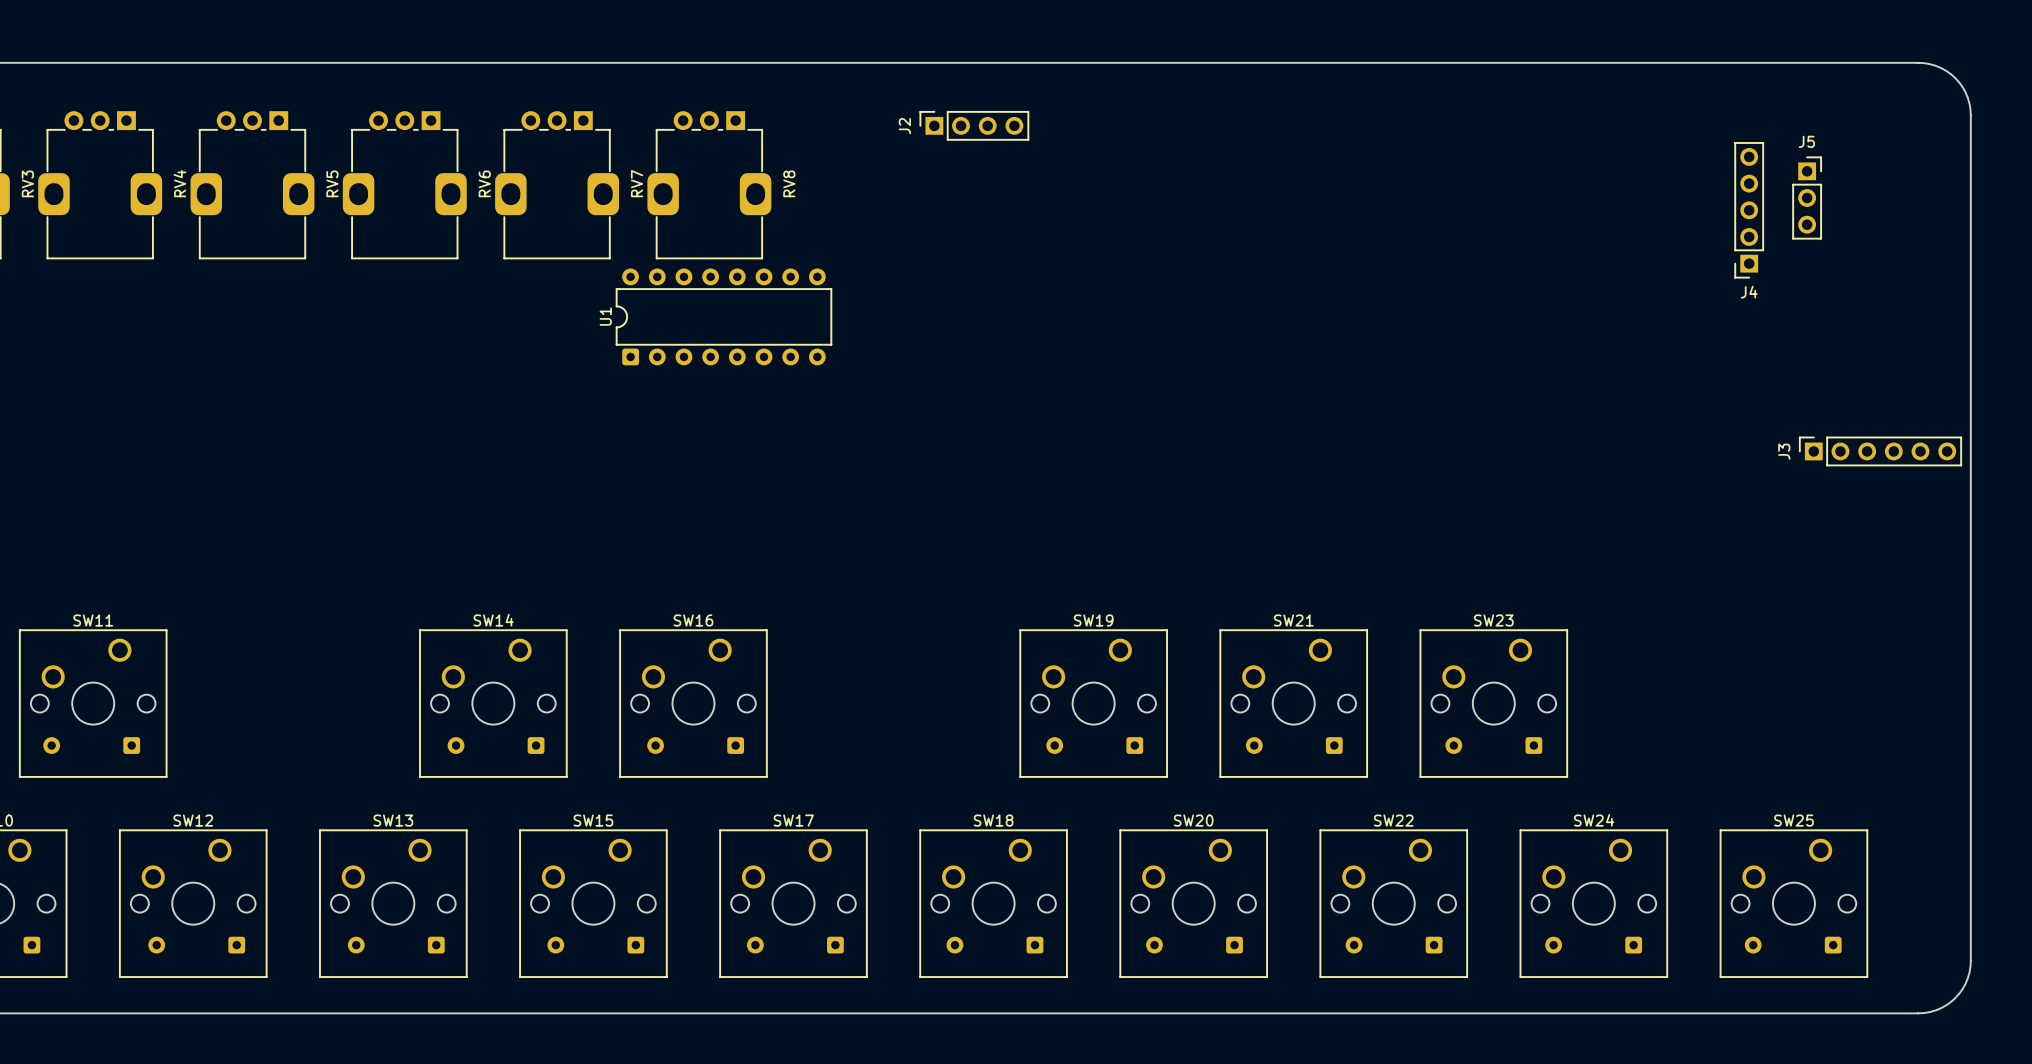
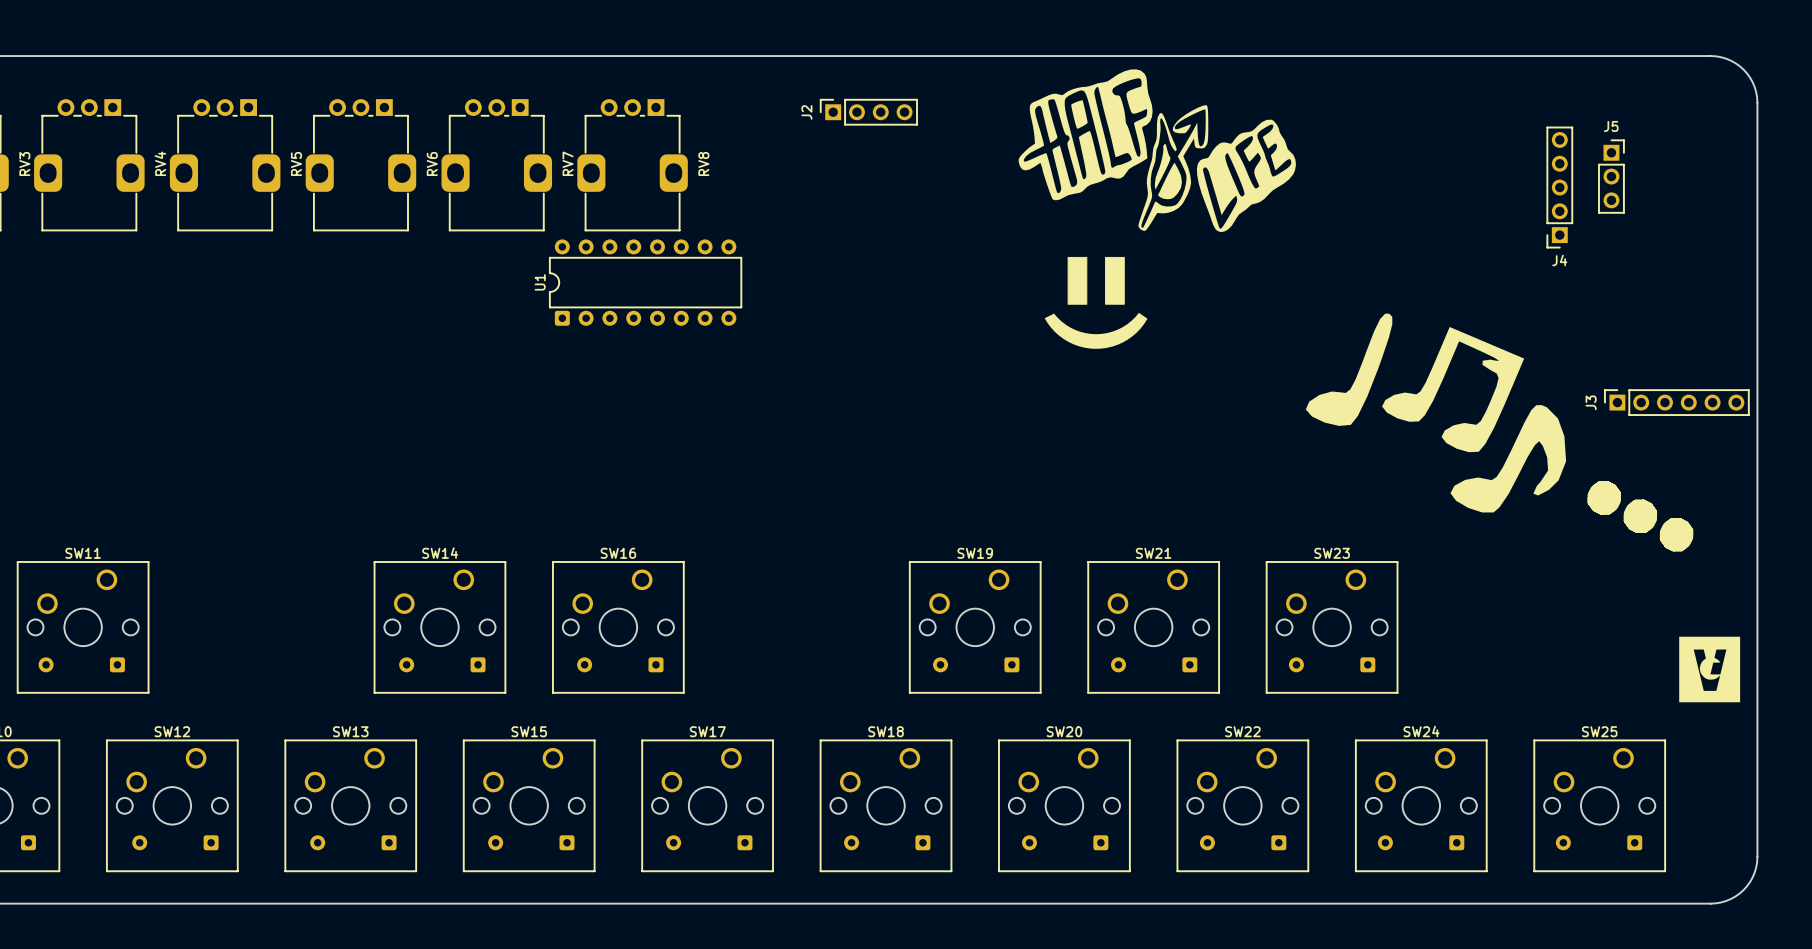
drawing: none -> [1018, 69, 1296, 233]
drawing: none -> [1044, 256, 1148, 349]
drawing: none -> [1305, 313, 1567, 513]
text: none -> ●●● (1640, 516)
drawing: none -> [1679, 636, 1741, 703]

